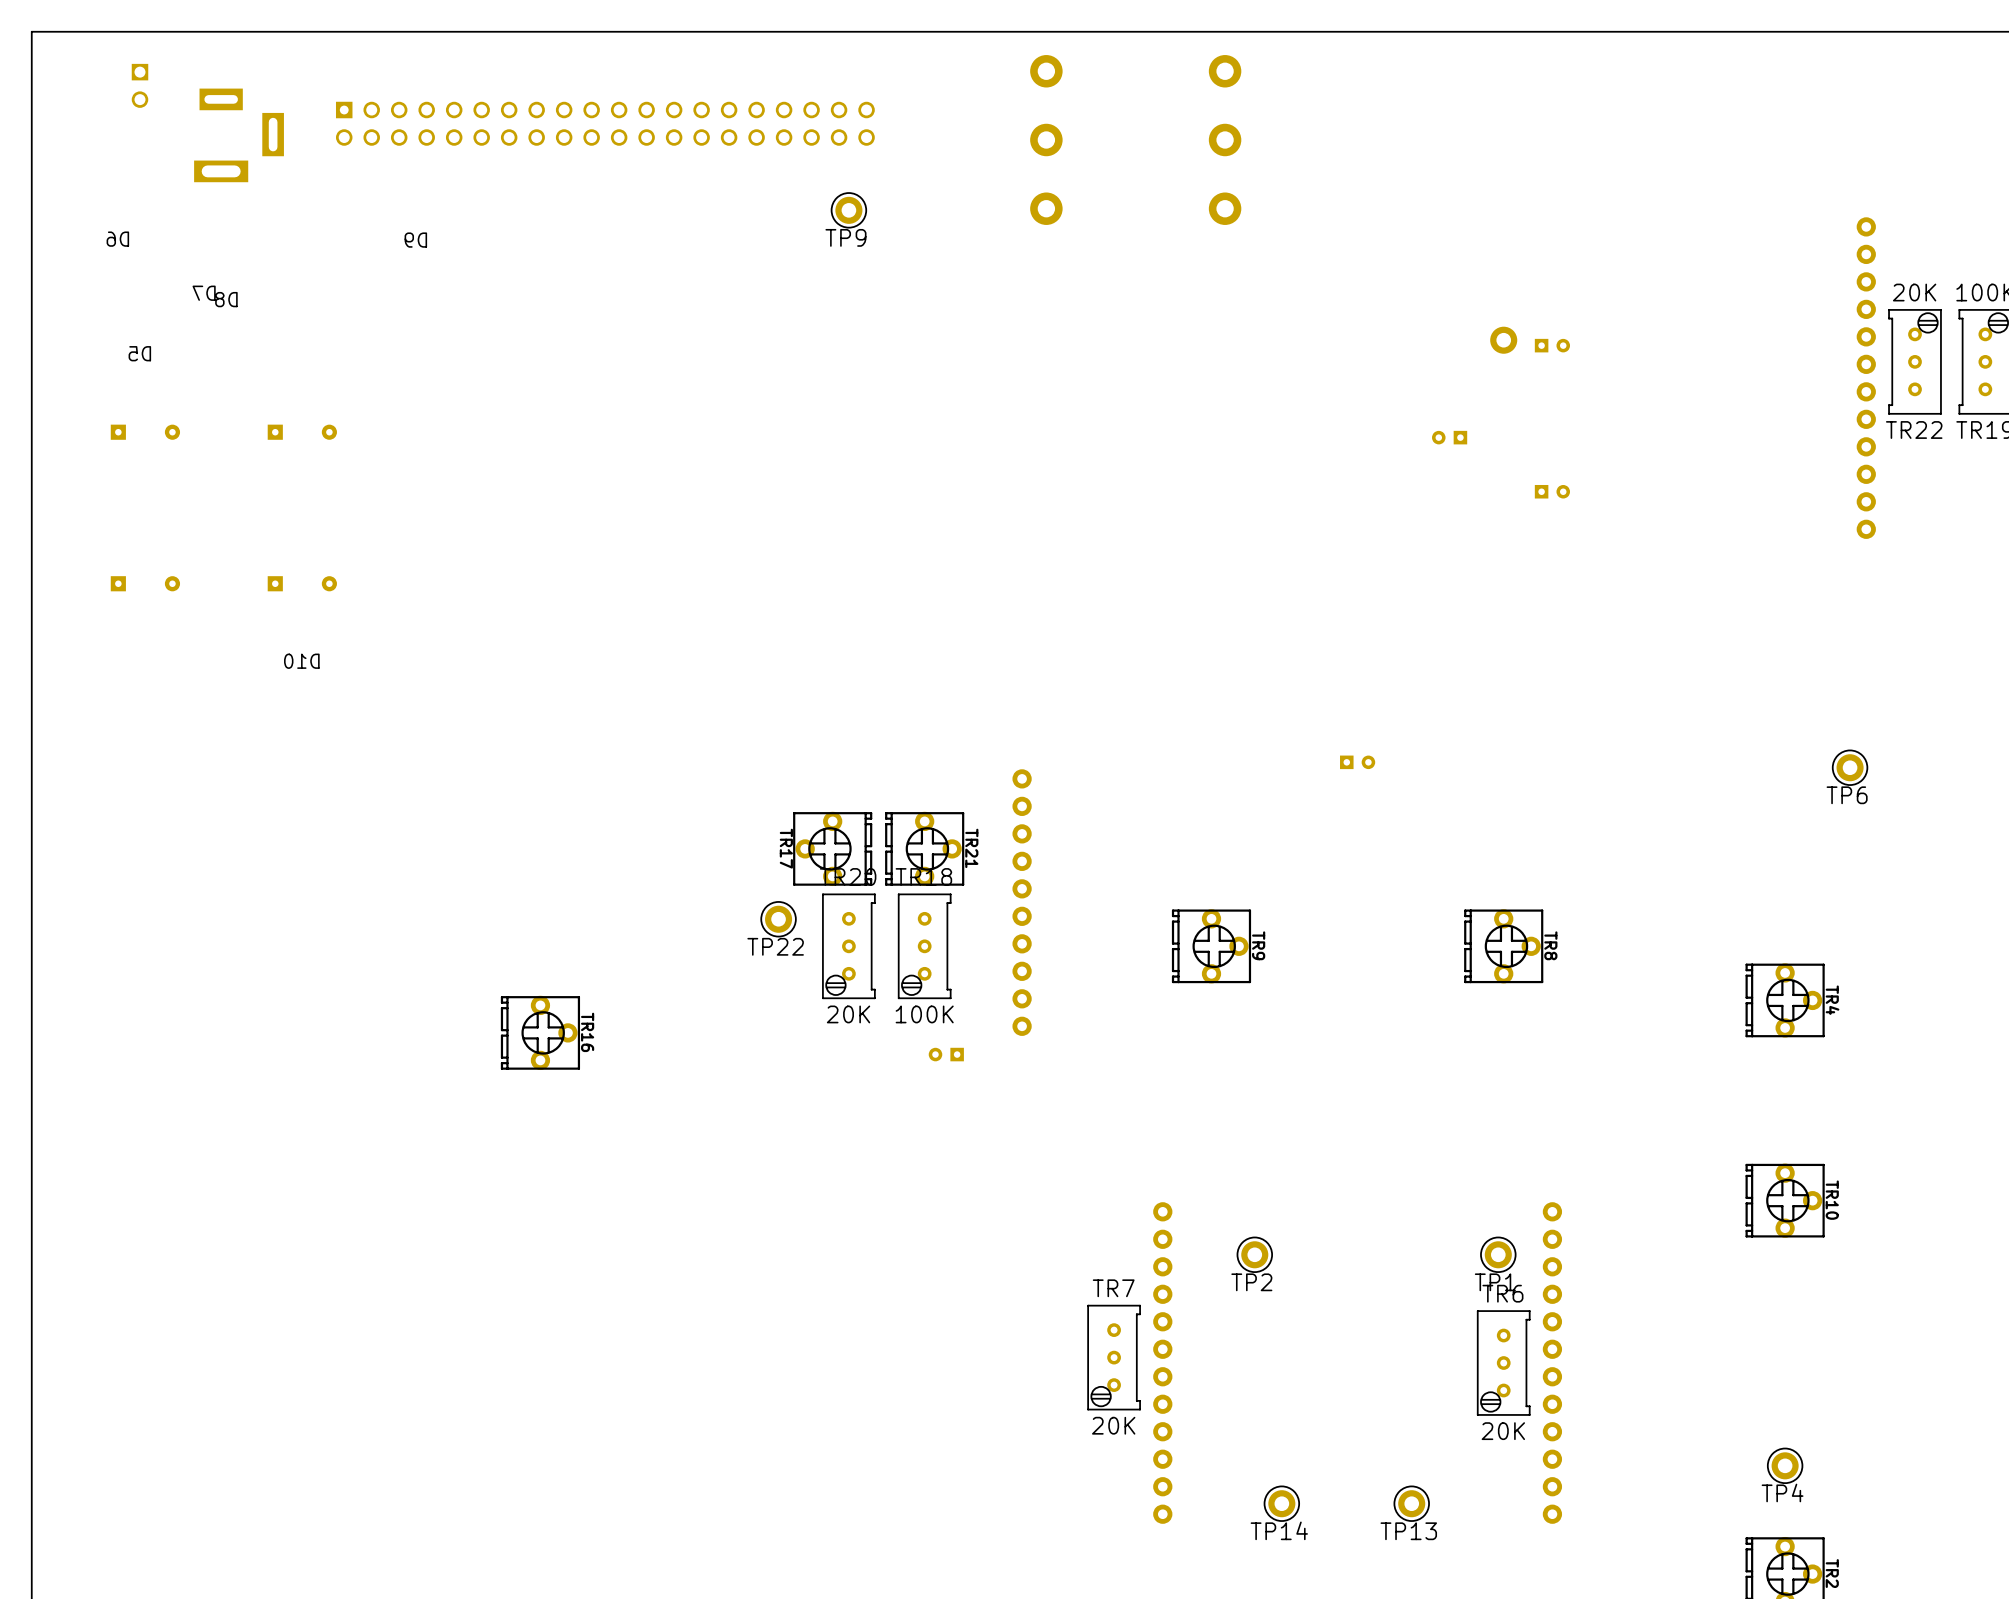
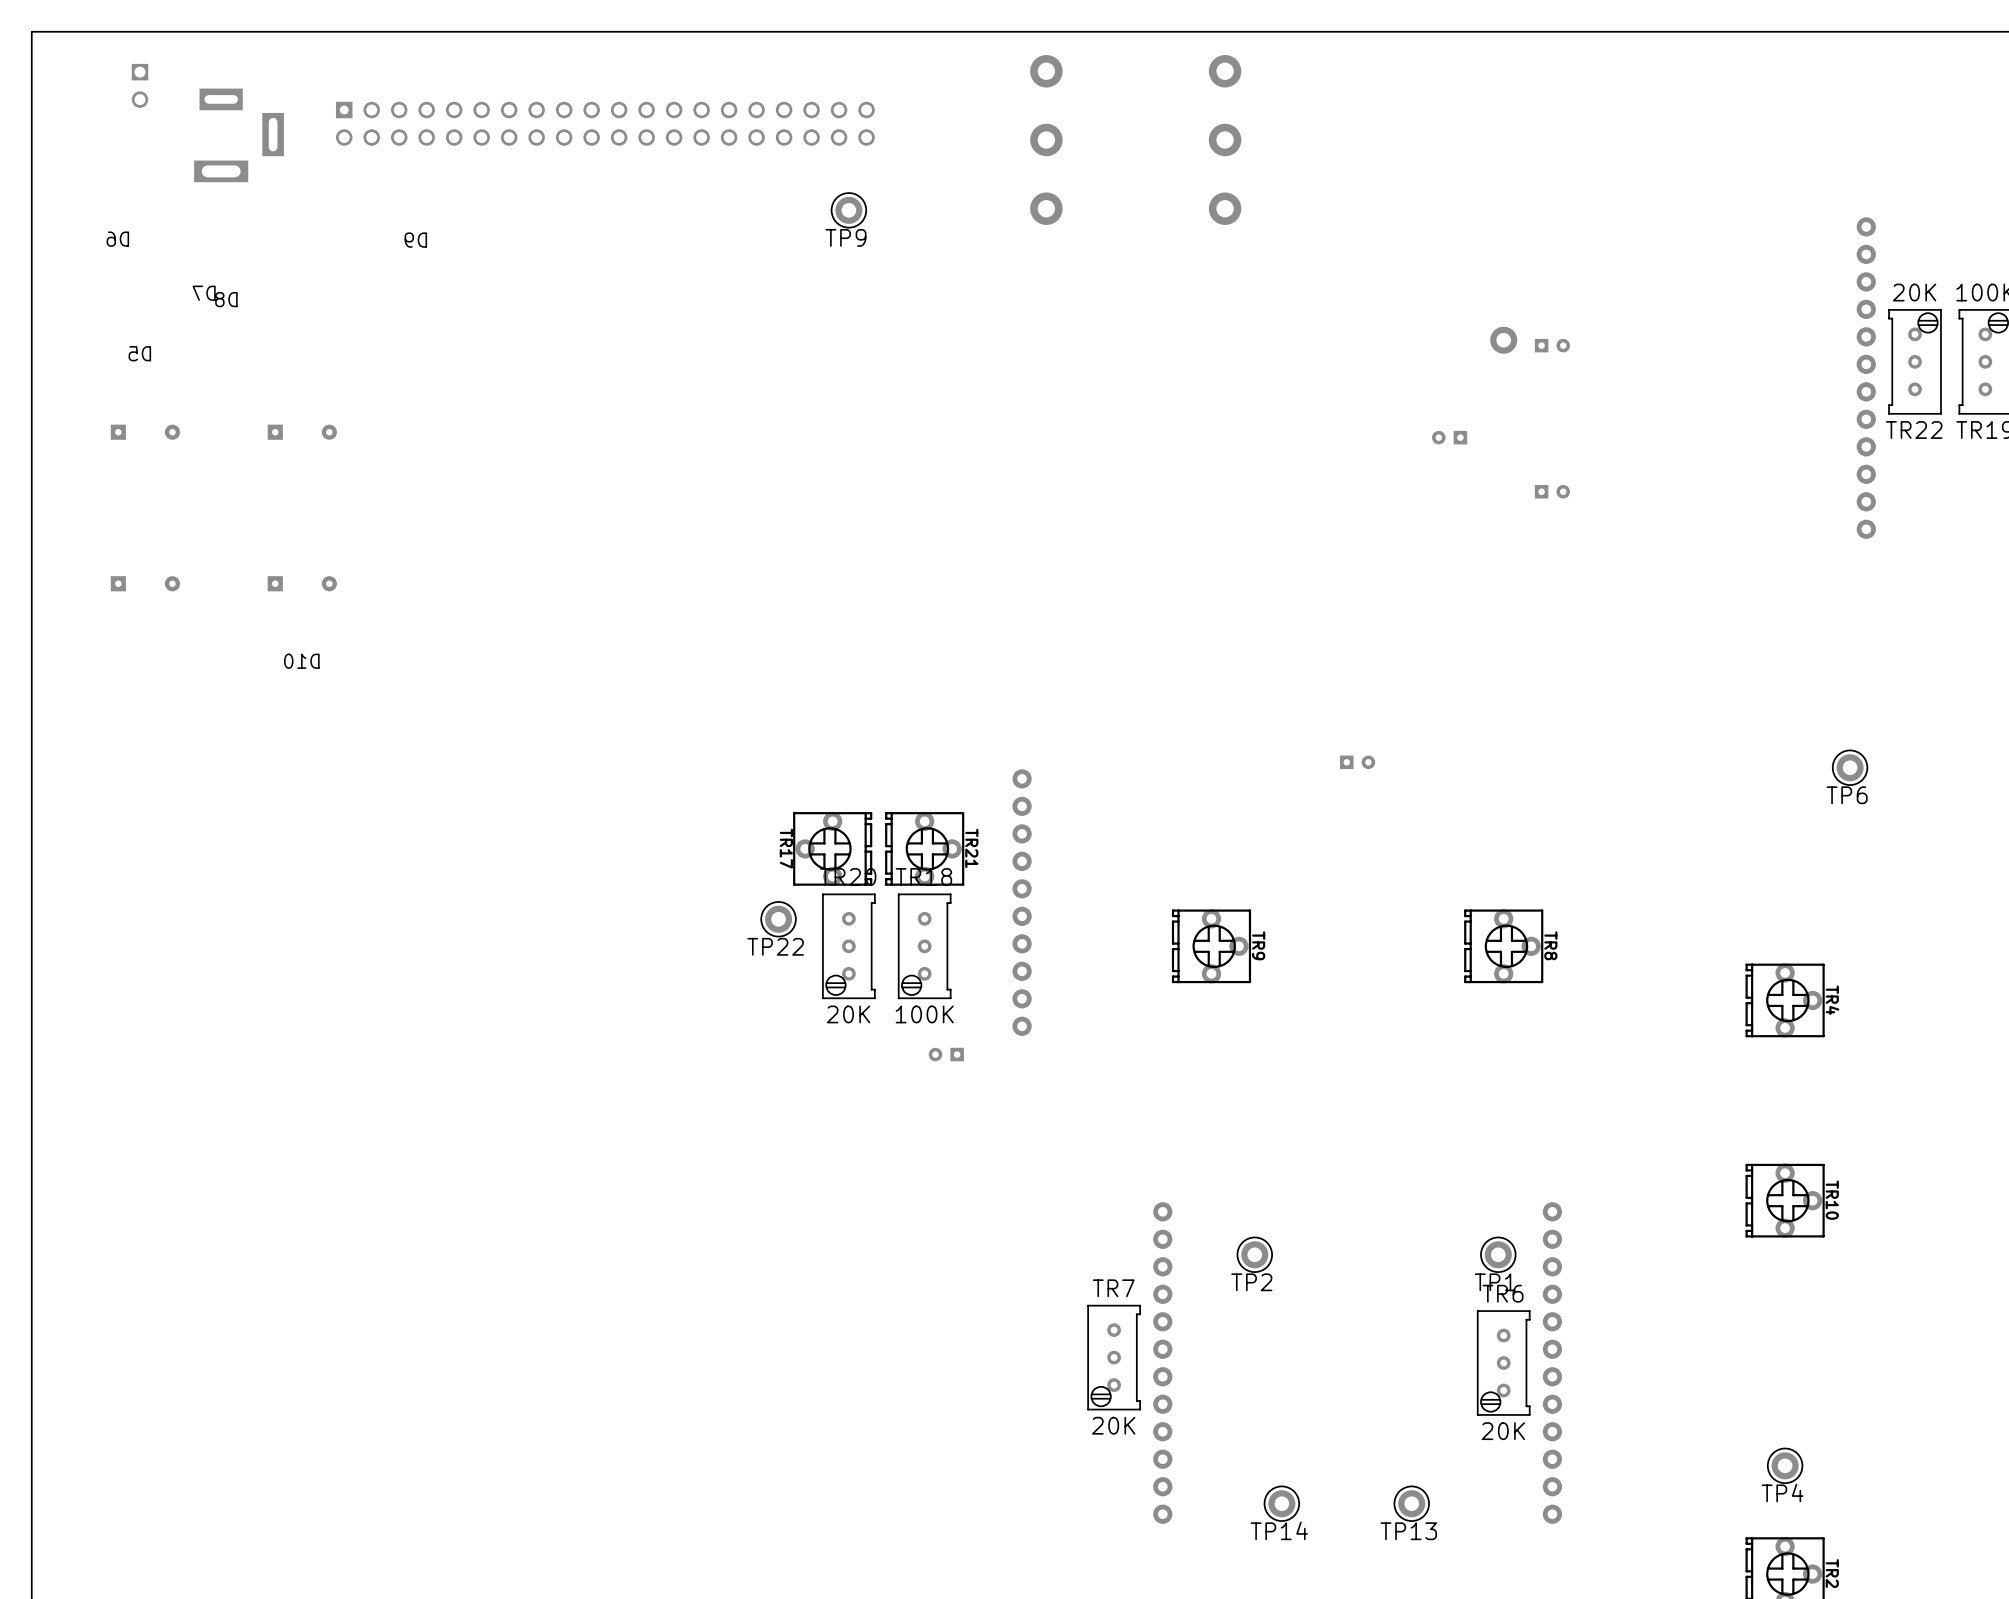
TR16: (540, 1032) -> none

